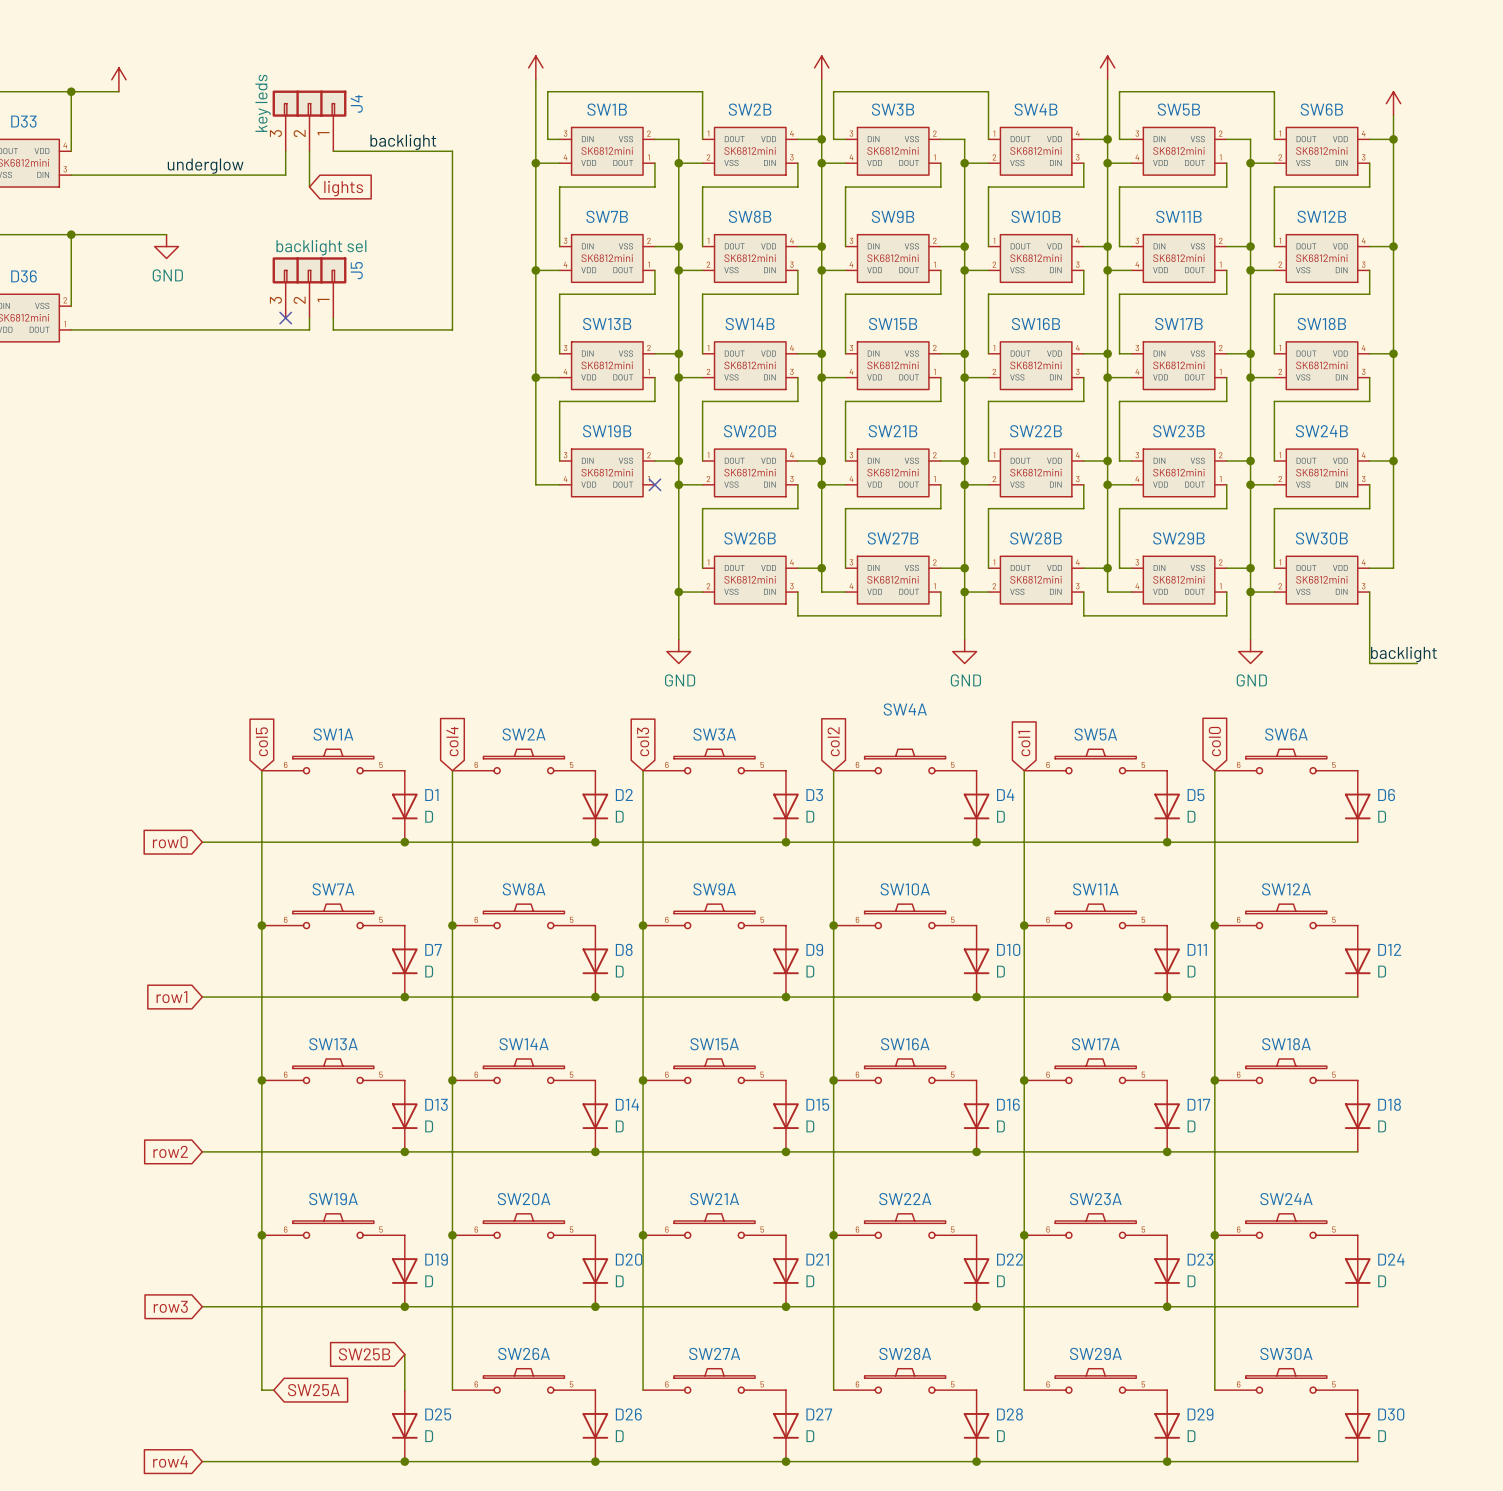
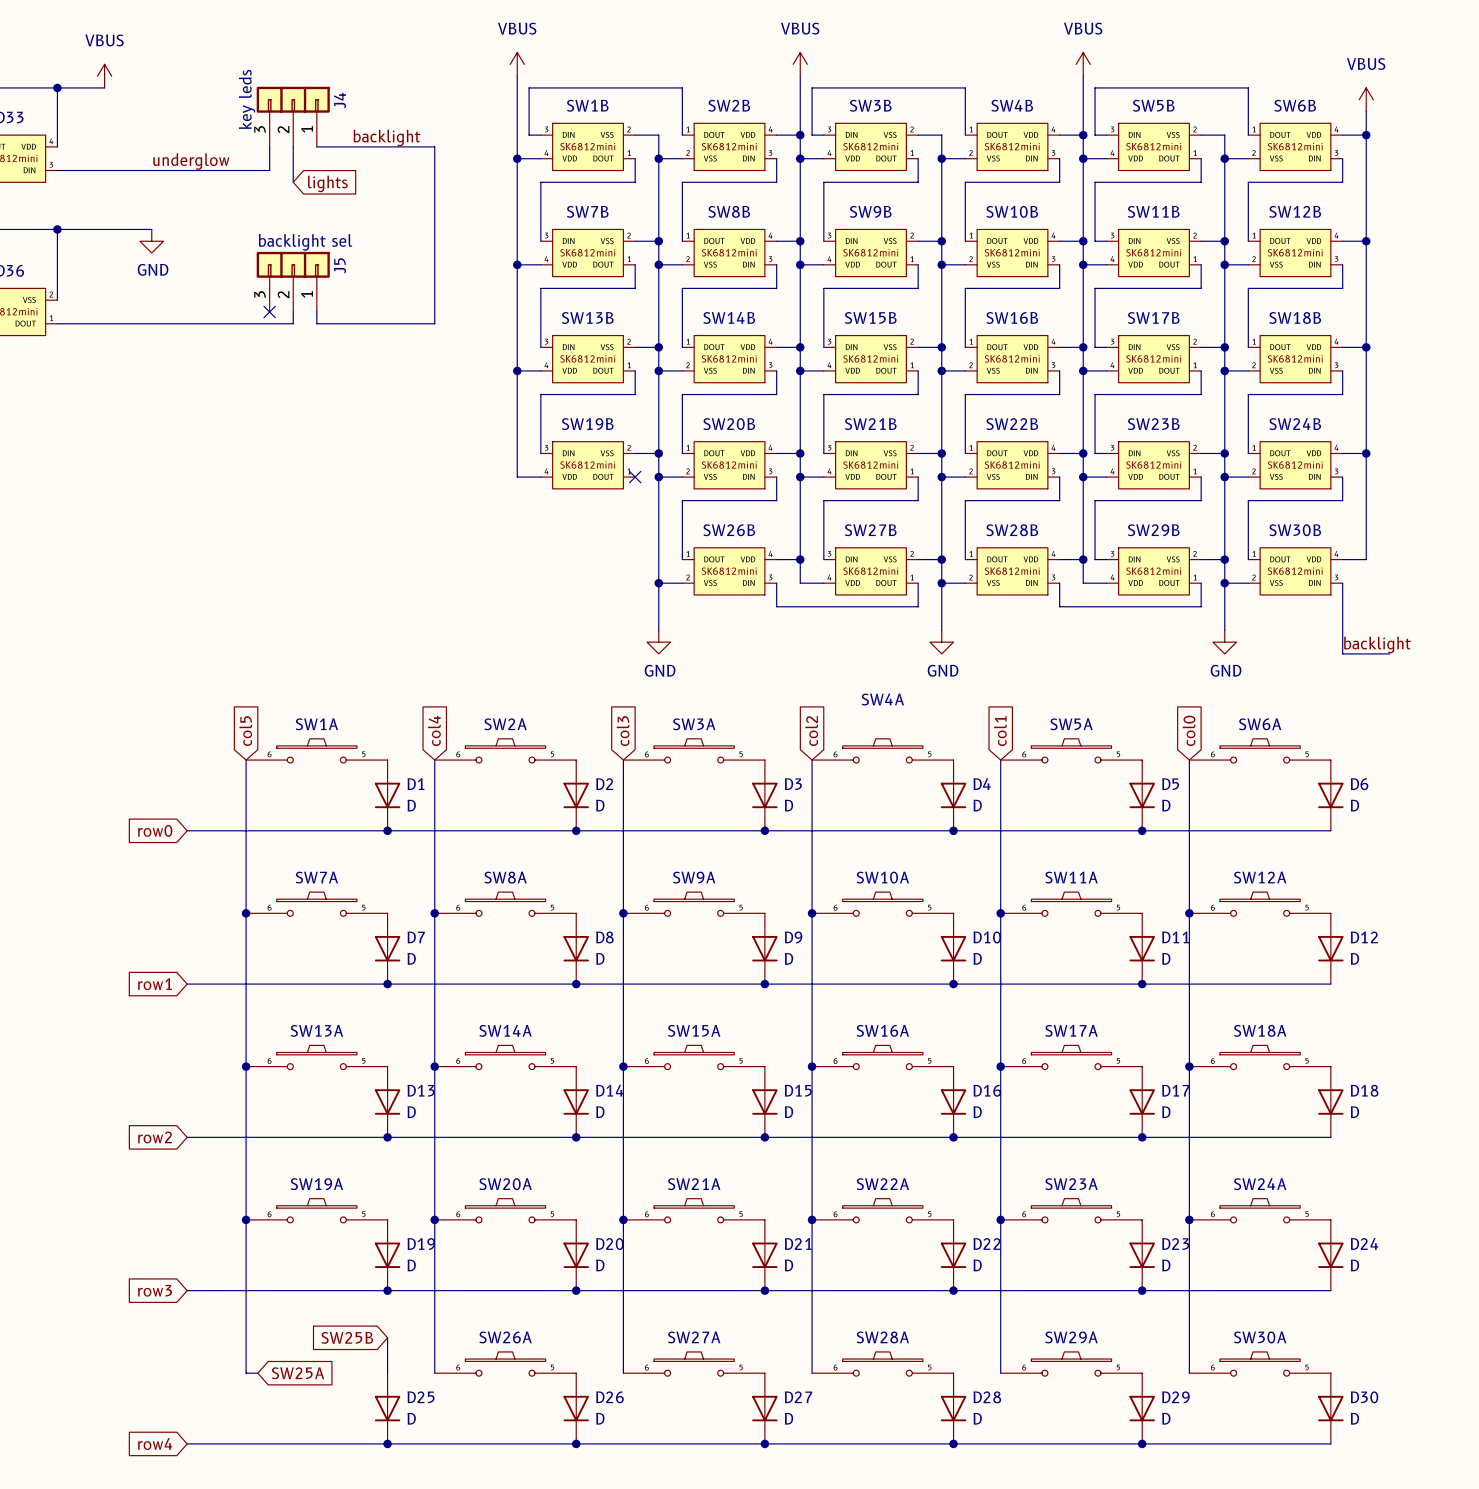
power symbol text: none -> VBUS (517, 28)
power symbol text: none -> VBUS (800, 28)
power symbol text: none -> VBUS (1083, 28)
power symbol text: none -> VBUS (104, 40)
power symbol text: none -> VBUS (1366, 64)

